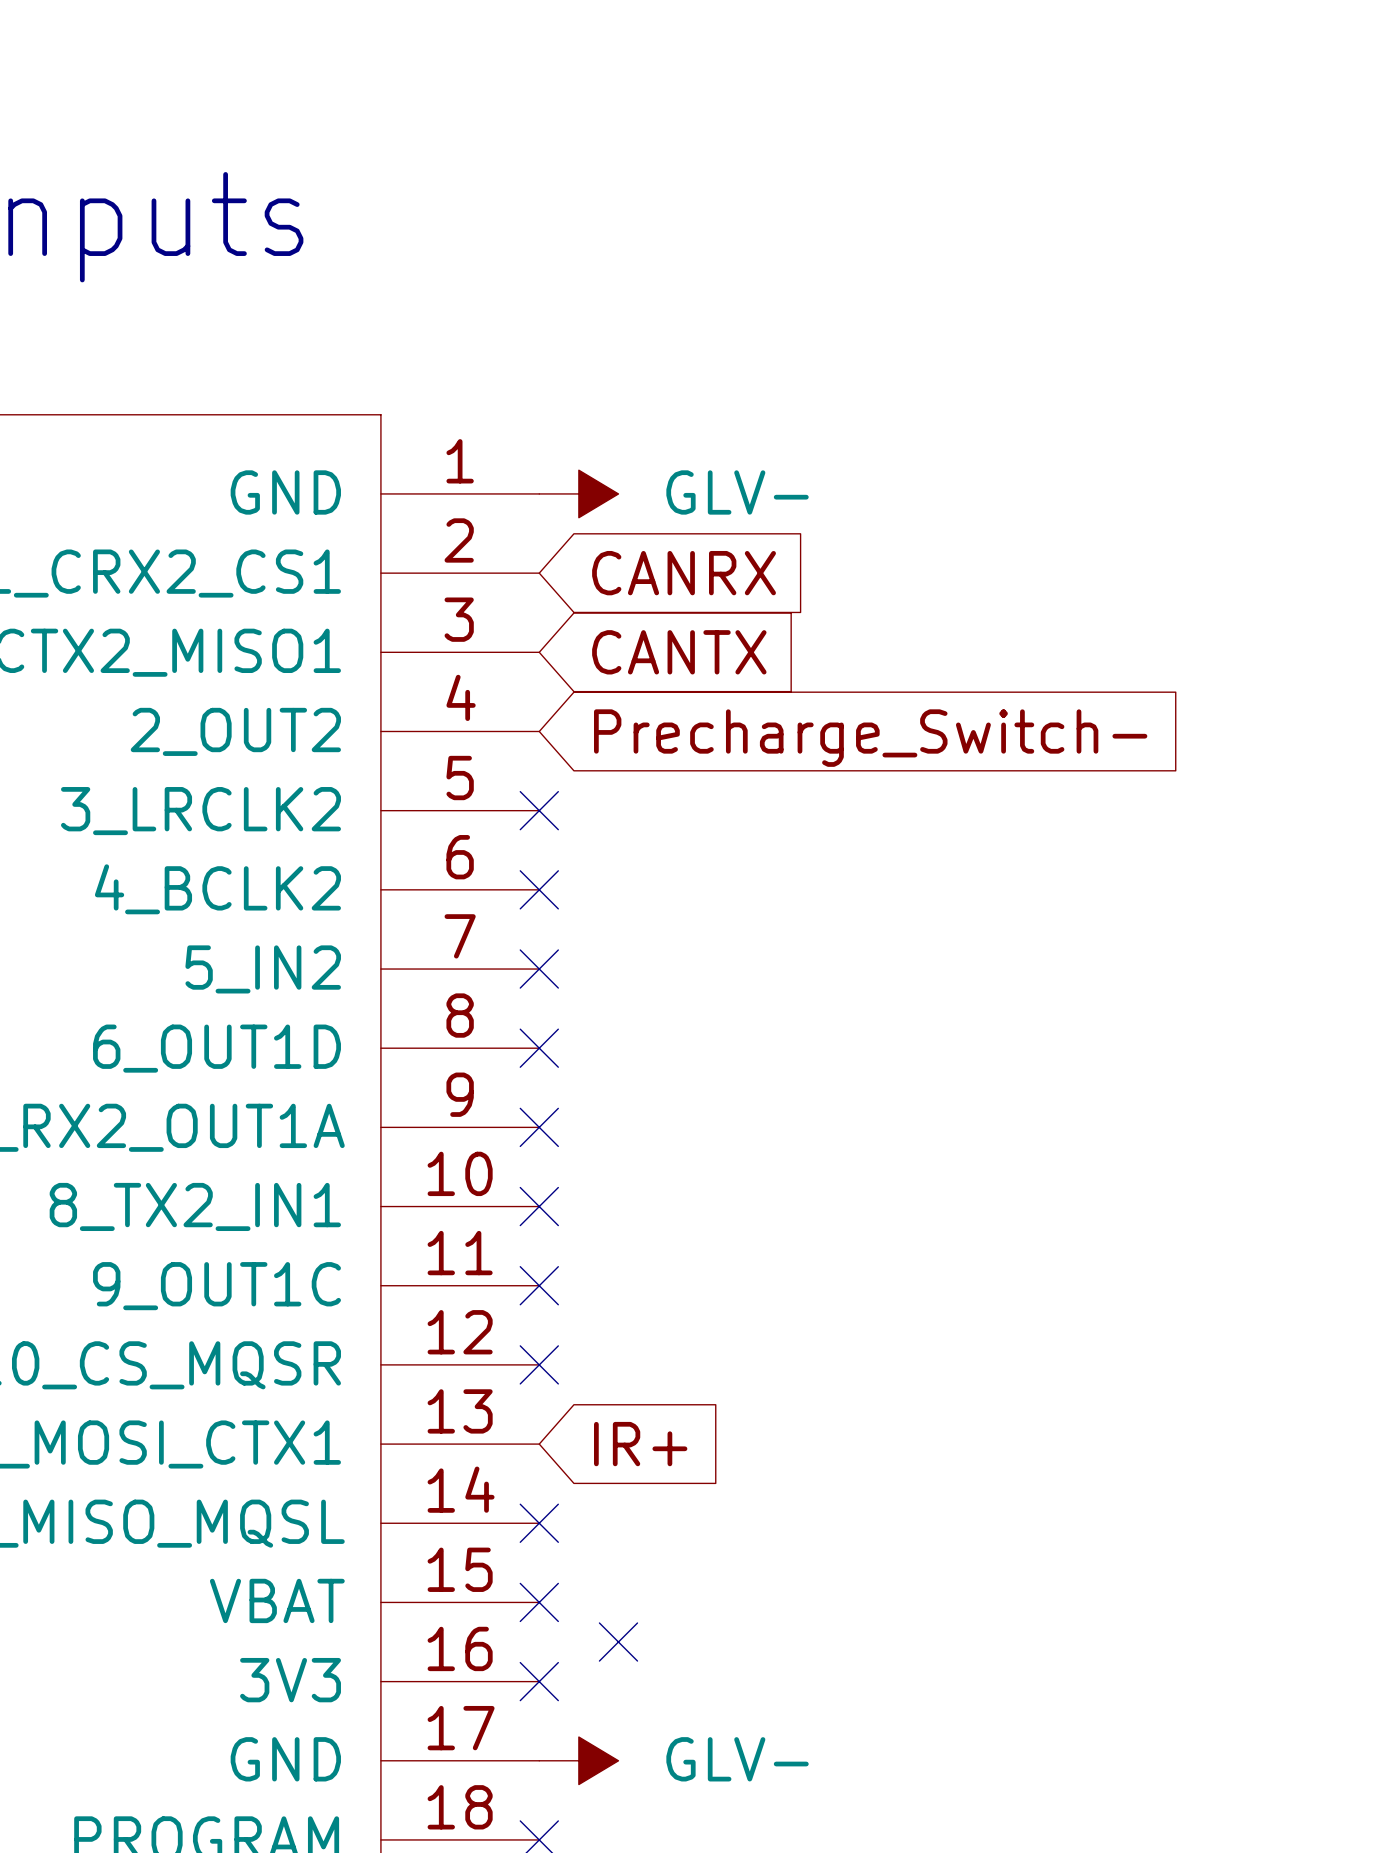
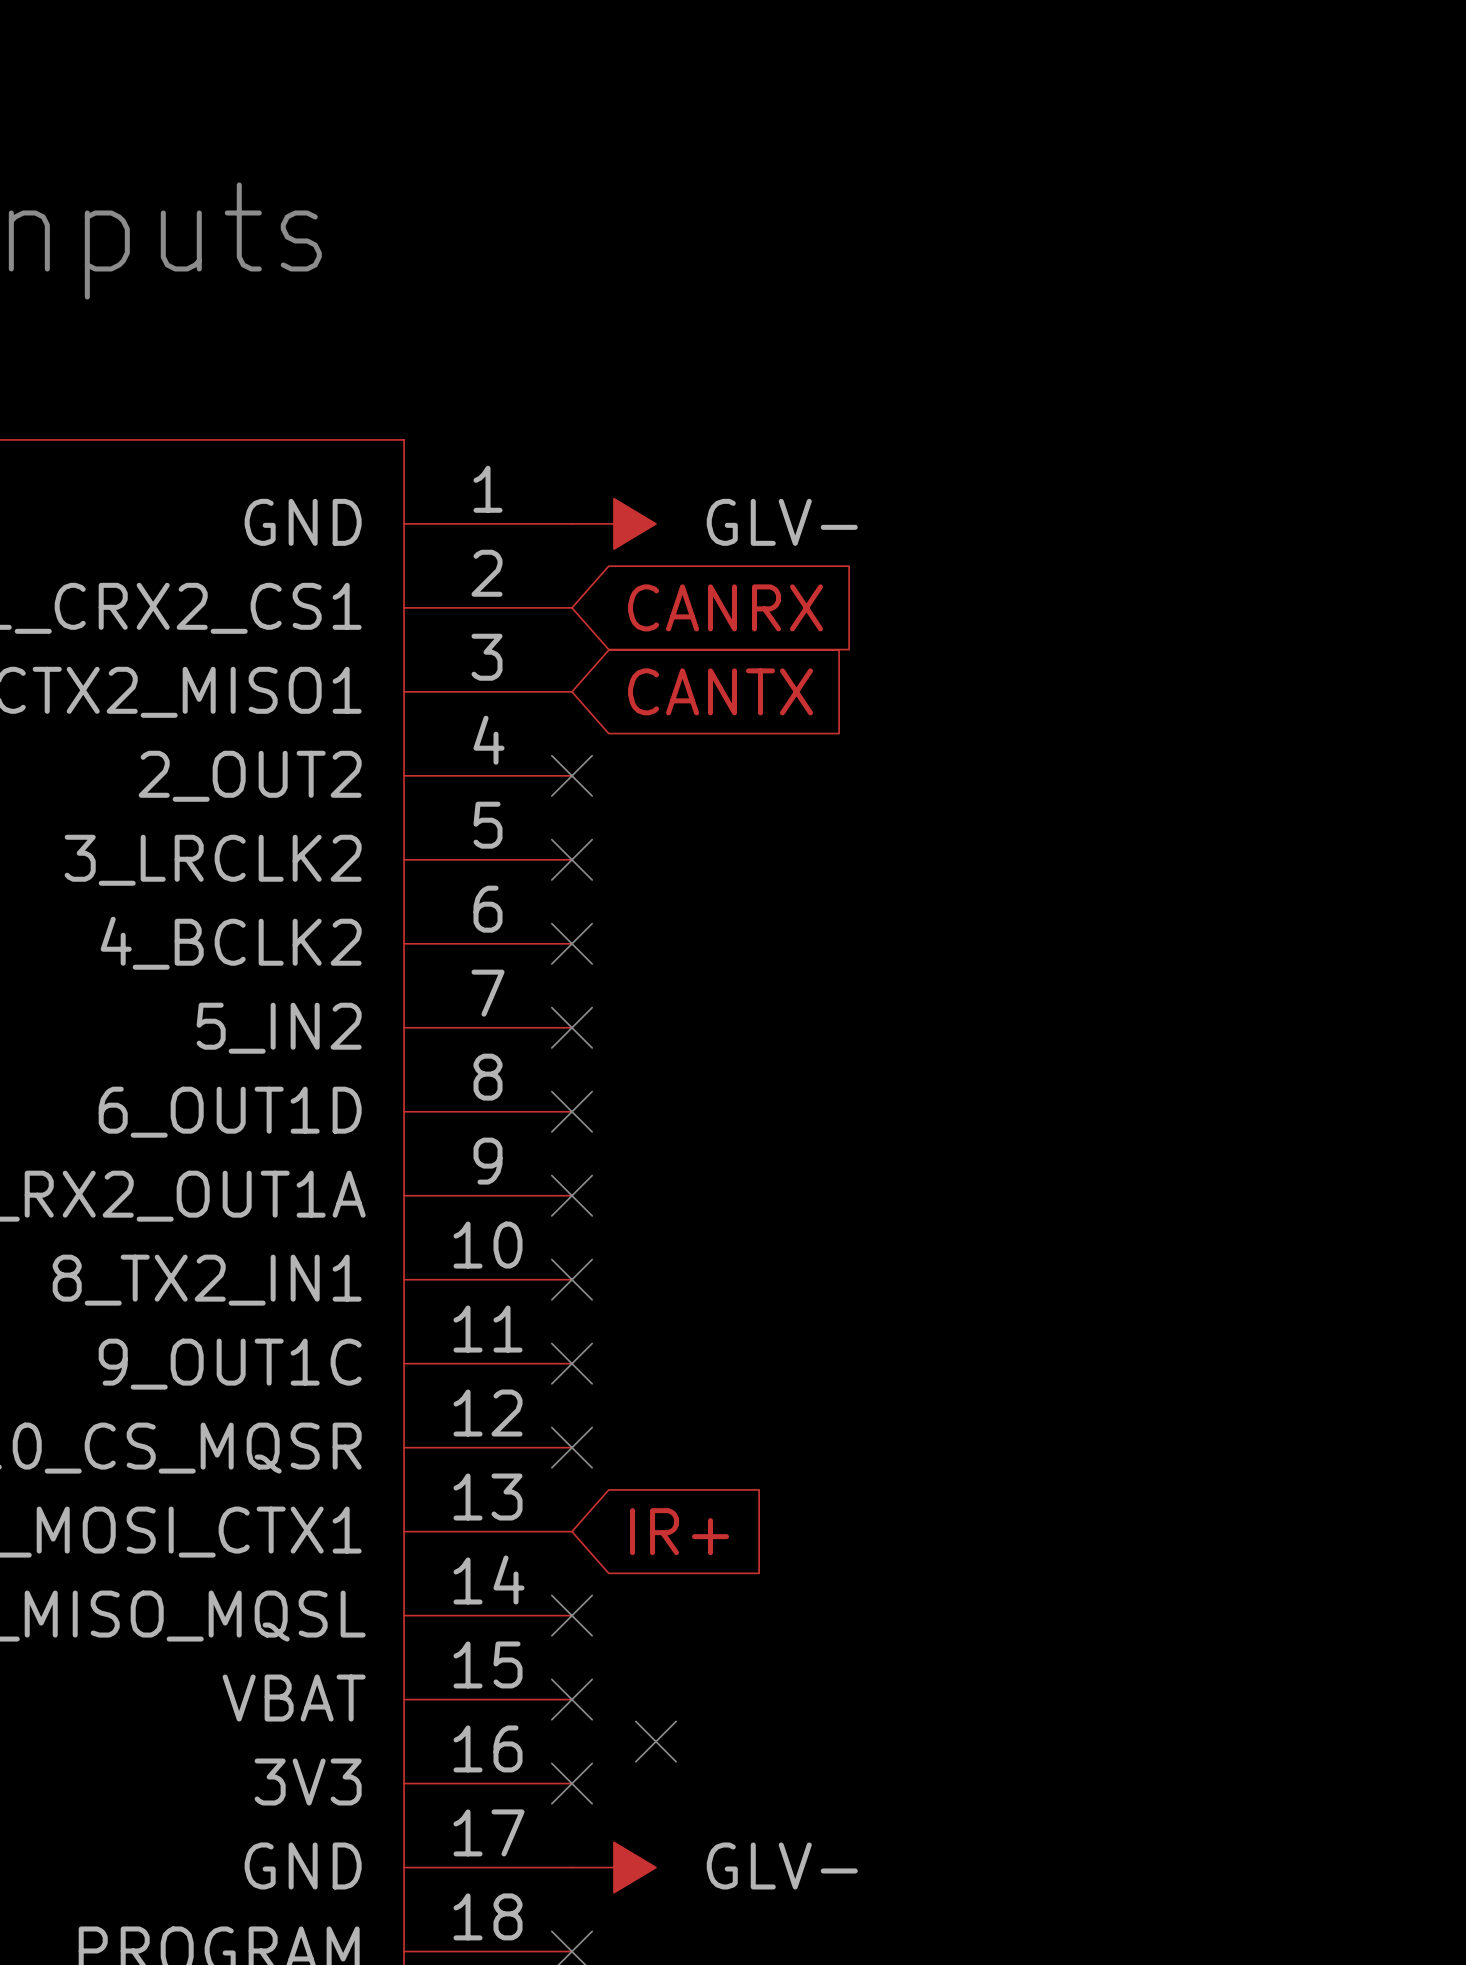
no-connect mark: none -> (571, 775)
global label: Precharge_Switch- (870, 738) -> none

